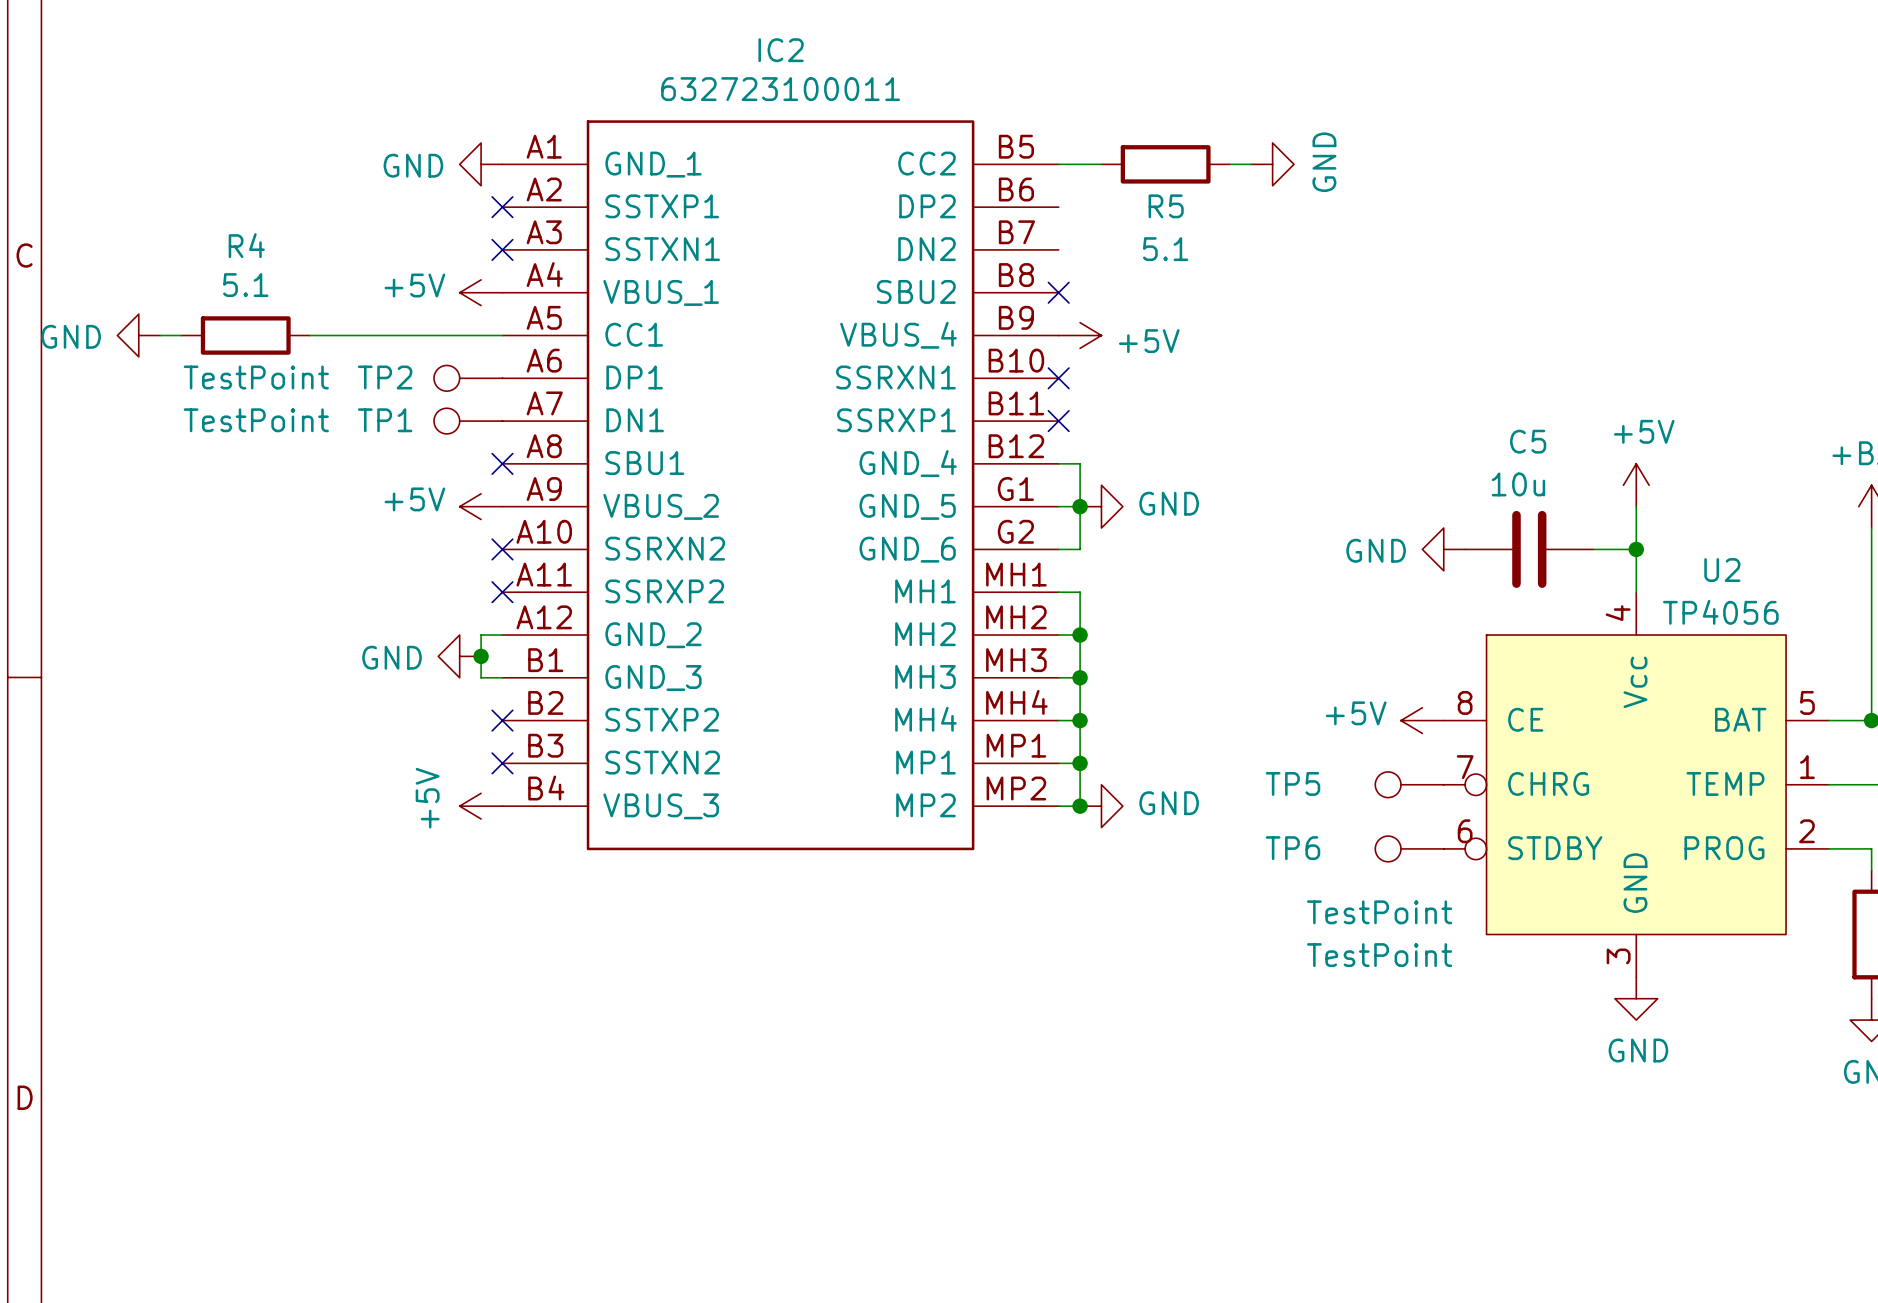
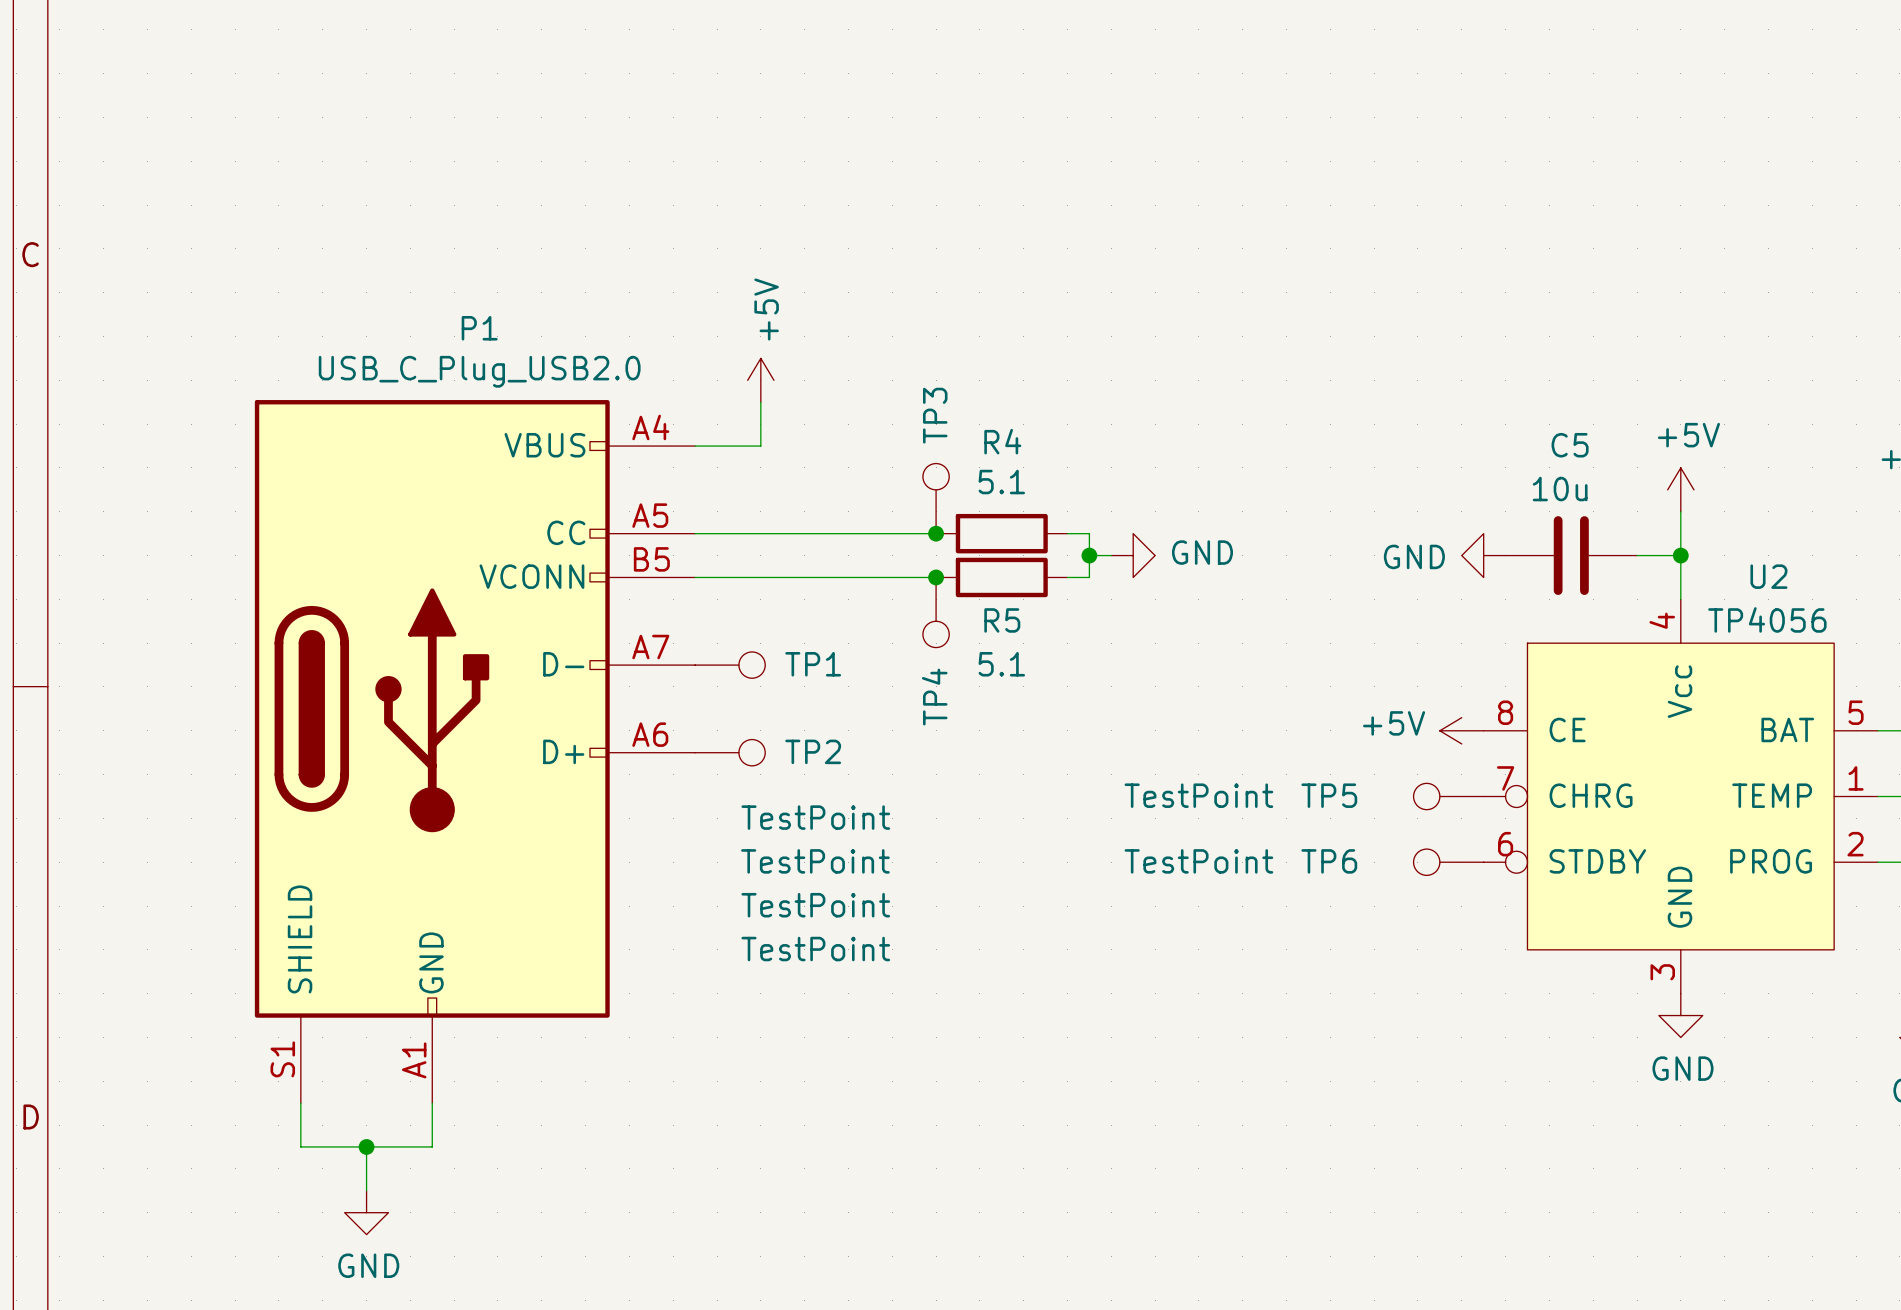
power symbol: GND (481, 164) -> none
wire: (1058, 164) (1101, 164) -> none
R5 position: (1165, 164) -> (1001, 577)
wire: (1229, 164) (1251, 164) -> none
power symbol: GND (1272, 164) -> none
no-connect mark: (502, 207) -> none
no-connect mark: (502, 249) -> none
power symbol: +5V (481, 292) -> none
no-connect mark: (1058, 292) -> none
power symbol: GND (138, 335) -> none
wire: (160, 335) (181, 335) -> none
R4 position: (245, 335) -> (1001, 533)
wire: (309, 335) (502, 335) -> none
power symbol: +5V (1080, 335) -> none
TP2 value position: TestPoint (256, 377) -> TestPoint (815, 949)
TP2 rotation: 0° (446, 378) -> 180° (752, 752)
TP2 position: (468, 378) -> (730, 752)
power symbol: none -> +5V (760, 380)
no-connect mark: (1058, 378) -> none
wire: none -> (760, 402) (760, 446) (695, 446)
TP1 value position: TestPoint (256, 420) -> TestPoint (815, 905)
TP1 rotation: 0° (446, 421) -> 180° (752, 665)
TP1 position: (468, 421) -> (730, 665)
no-connect mark: (1058, 421) -> none
no-connect mark: (502, 463) -> none
wire: (1058, 463) (1080, 463) (1080, 549) -> none
IC2: 632723100011 (780, 485) -> none
TP3: none -> TestPoint (936, 498)
power symbol: +5V (481, 506) -> none
wire: (1058, 506) (1080, 506) -> none
junction: (1080, 506) -> none
power symbol position: GND (1101, 506) -> GND (1133, 555)
wire: none -> (695, 533) (936, 533)
junction: none -> (936, 533)
wire: none -> (1067, 533) (1089, 533) (1089, 577) (1067, 577)
no-connect mark: (502, 549) -> none
junction: none -> (1089, 555)
wire: none -> (695, 577) (936, 577)
junction: none -> (936, 577)
no-connect mark: (502, 592) -> none
wire: (1058, 592) (1080, 592) (1080, 806) (1058, 806) -> none
TP4: none -> TestPoint (936, 612)
wire: (1058, 635) (1080, 635) -> none
junction: (1080, 635) -> none
power symbol: GND (459, 656) -> none
junction: (481, 656) -> none
wire: (1058, 677) (1080, 677) -> none
junction: (1080, 677) -> none
no-connect mark: (502, 720) -> none
wire: (1058, 720) (1080, 720) -> none
junction: (1080, 720) -> none
P1: none -> USB_C_Plug_USB2.0 (474, 751)
no-connect mark: (502, 763) -> none
wire: (1058, 763) (1080, 763) -> none
junction: (1080, 763) -> none
power symbol: +5V (481, 806) -> none
junction: (1080, 806) -> none
power symbol: GND (1101, 806) -> none
TP5 value position: TestPoint (1379, 912) -> TestPoint (1198, 795)
TP6 value position: TestPoint (1379, 955) -> TestPoint (1198, 861)
wire: none -> (300, 1103) (300, 1146) (432, 1146) (432, 1103)
wire: none -> (366, 1146) (366, 1190)
junction: none -> (366, 1146)
power symbol: none -> GND (366, 1212)

